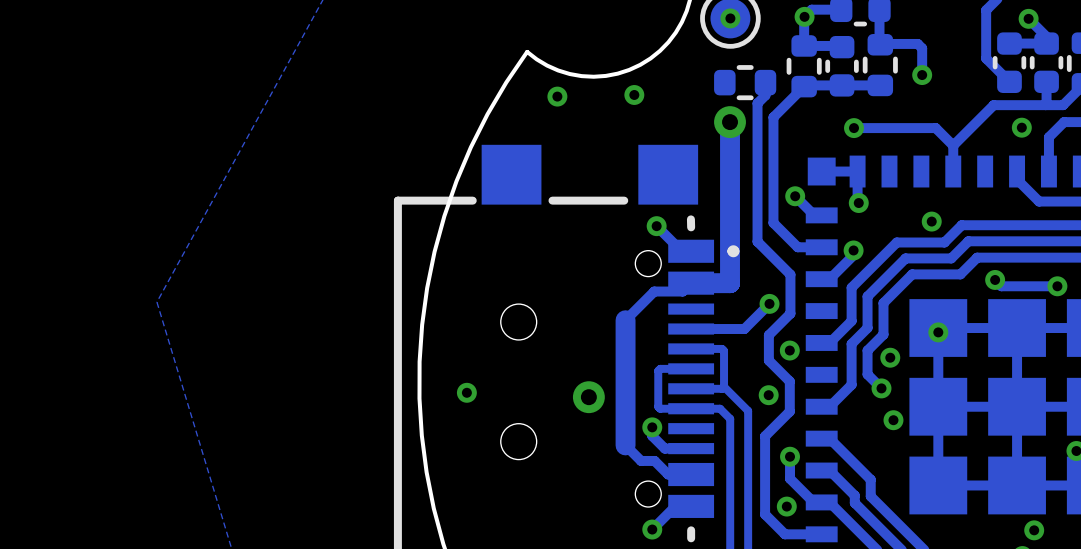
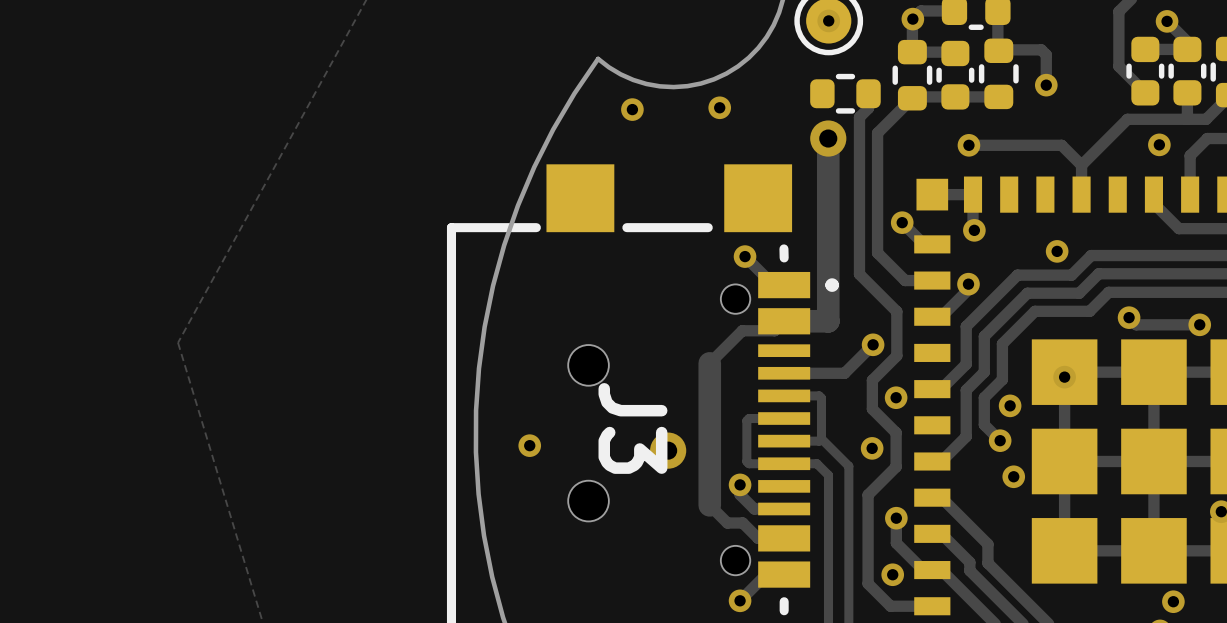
J3 name: none -> J3 (632, 428)

